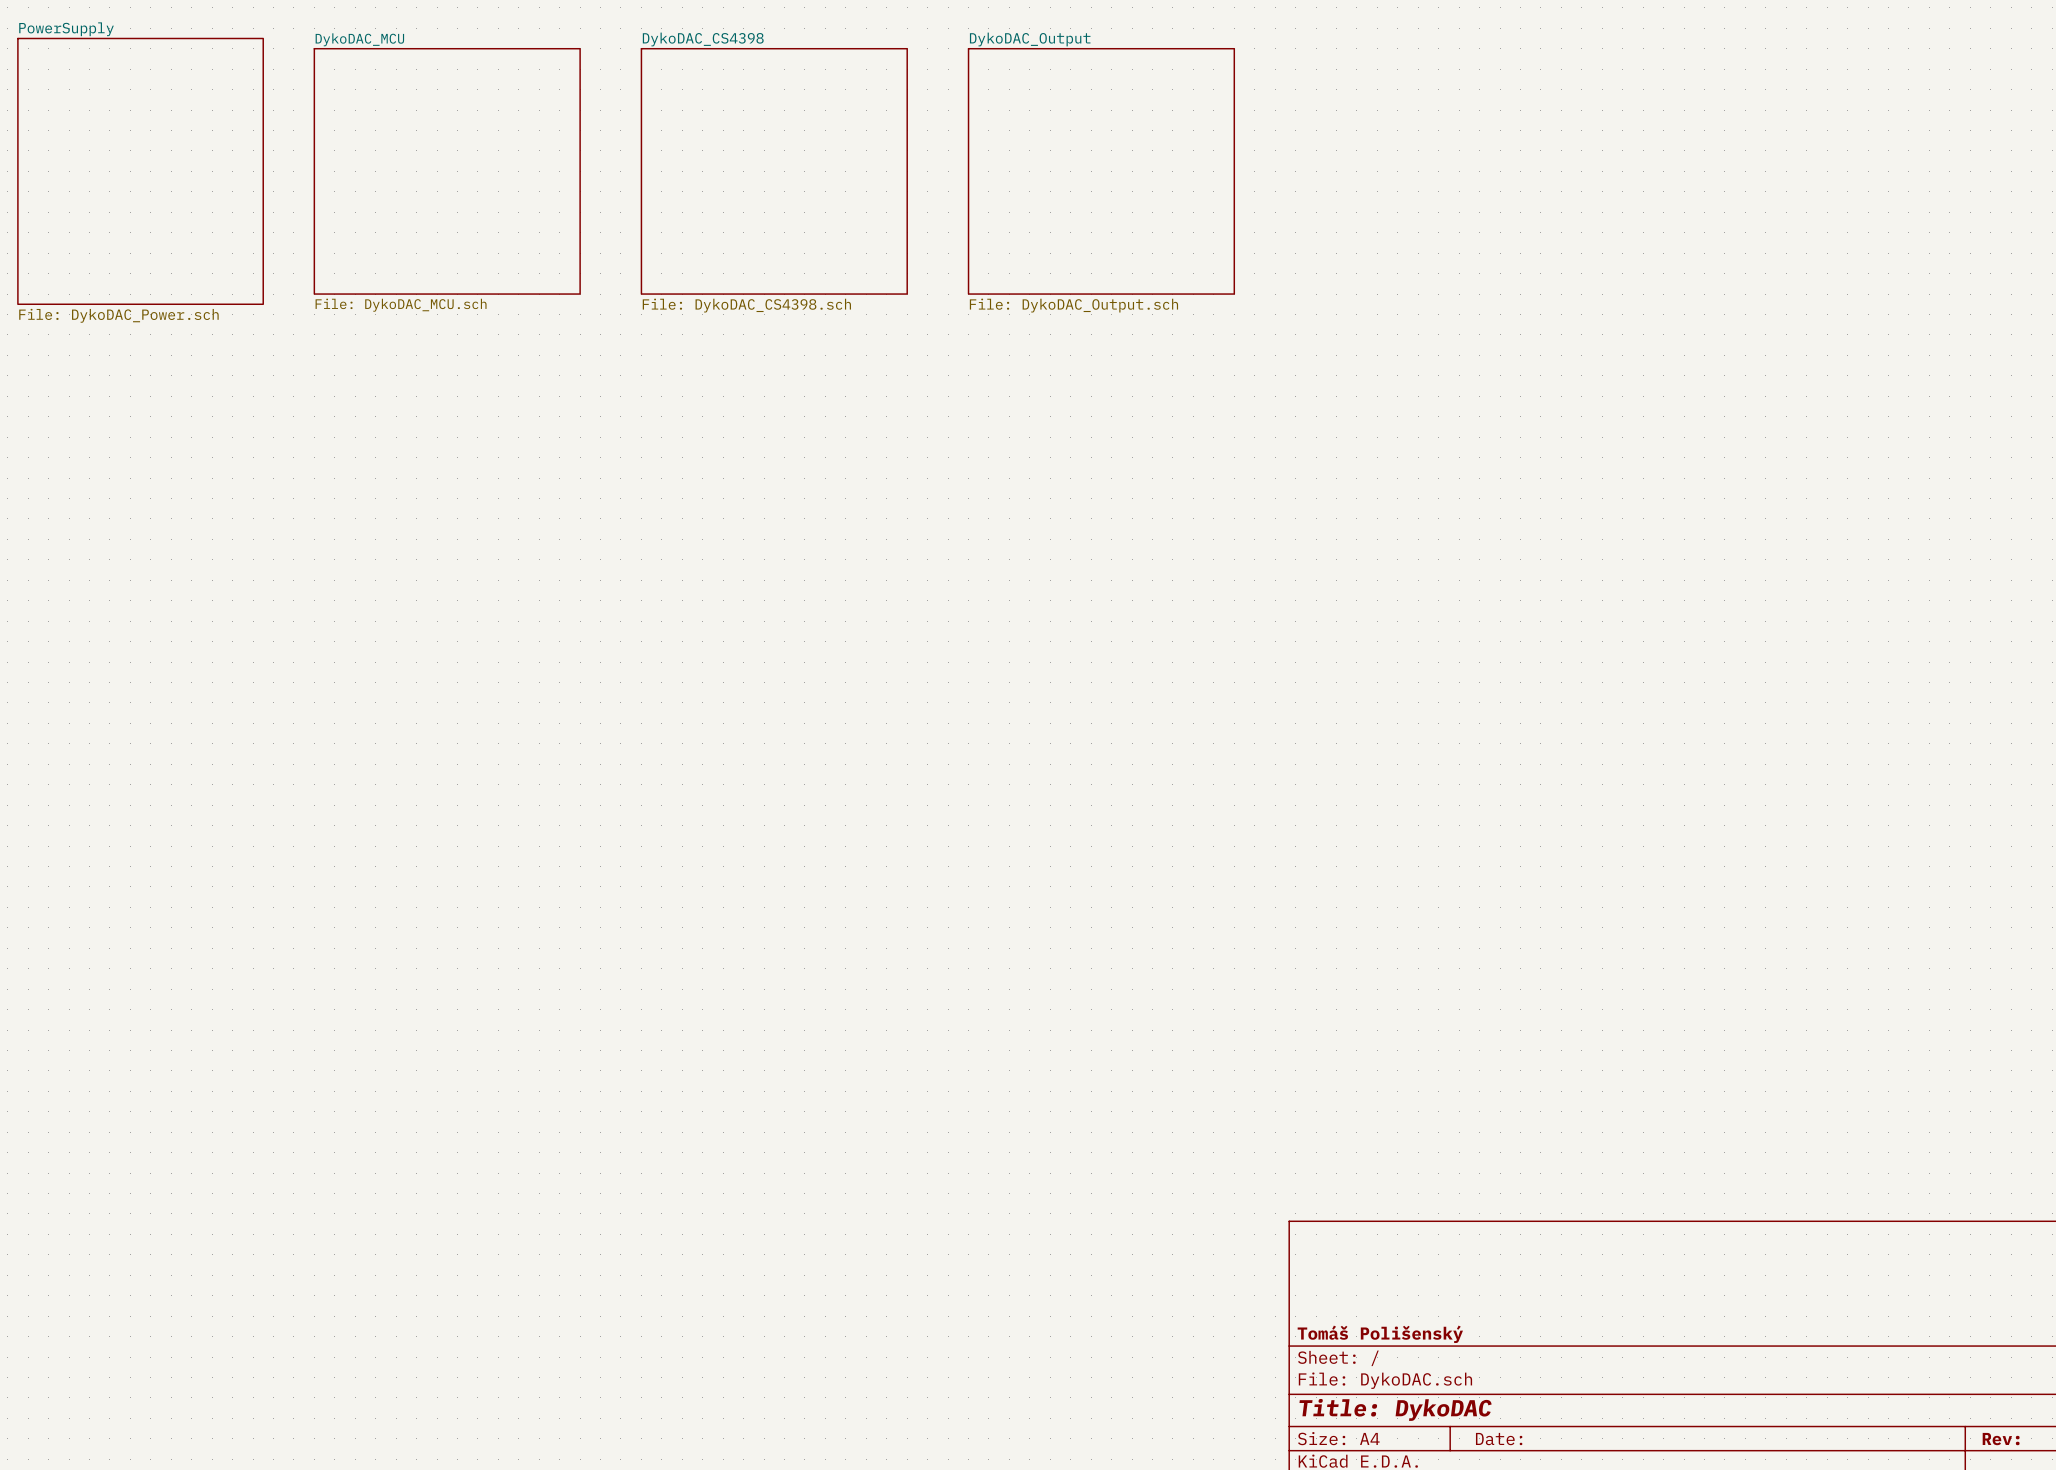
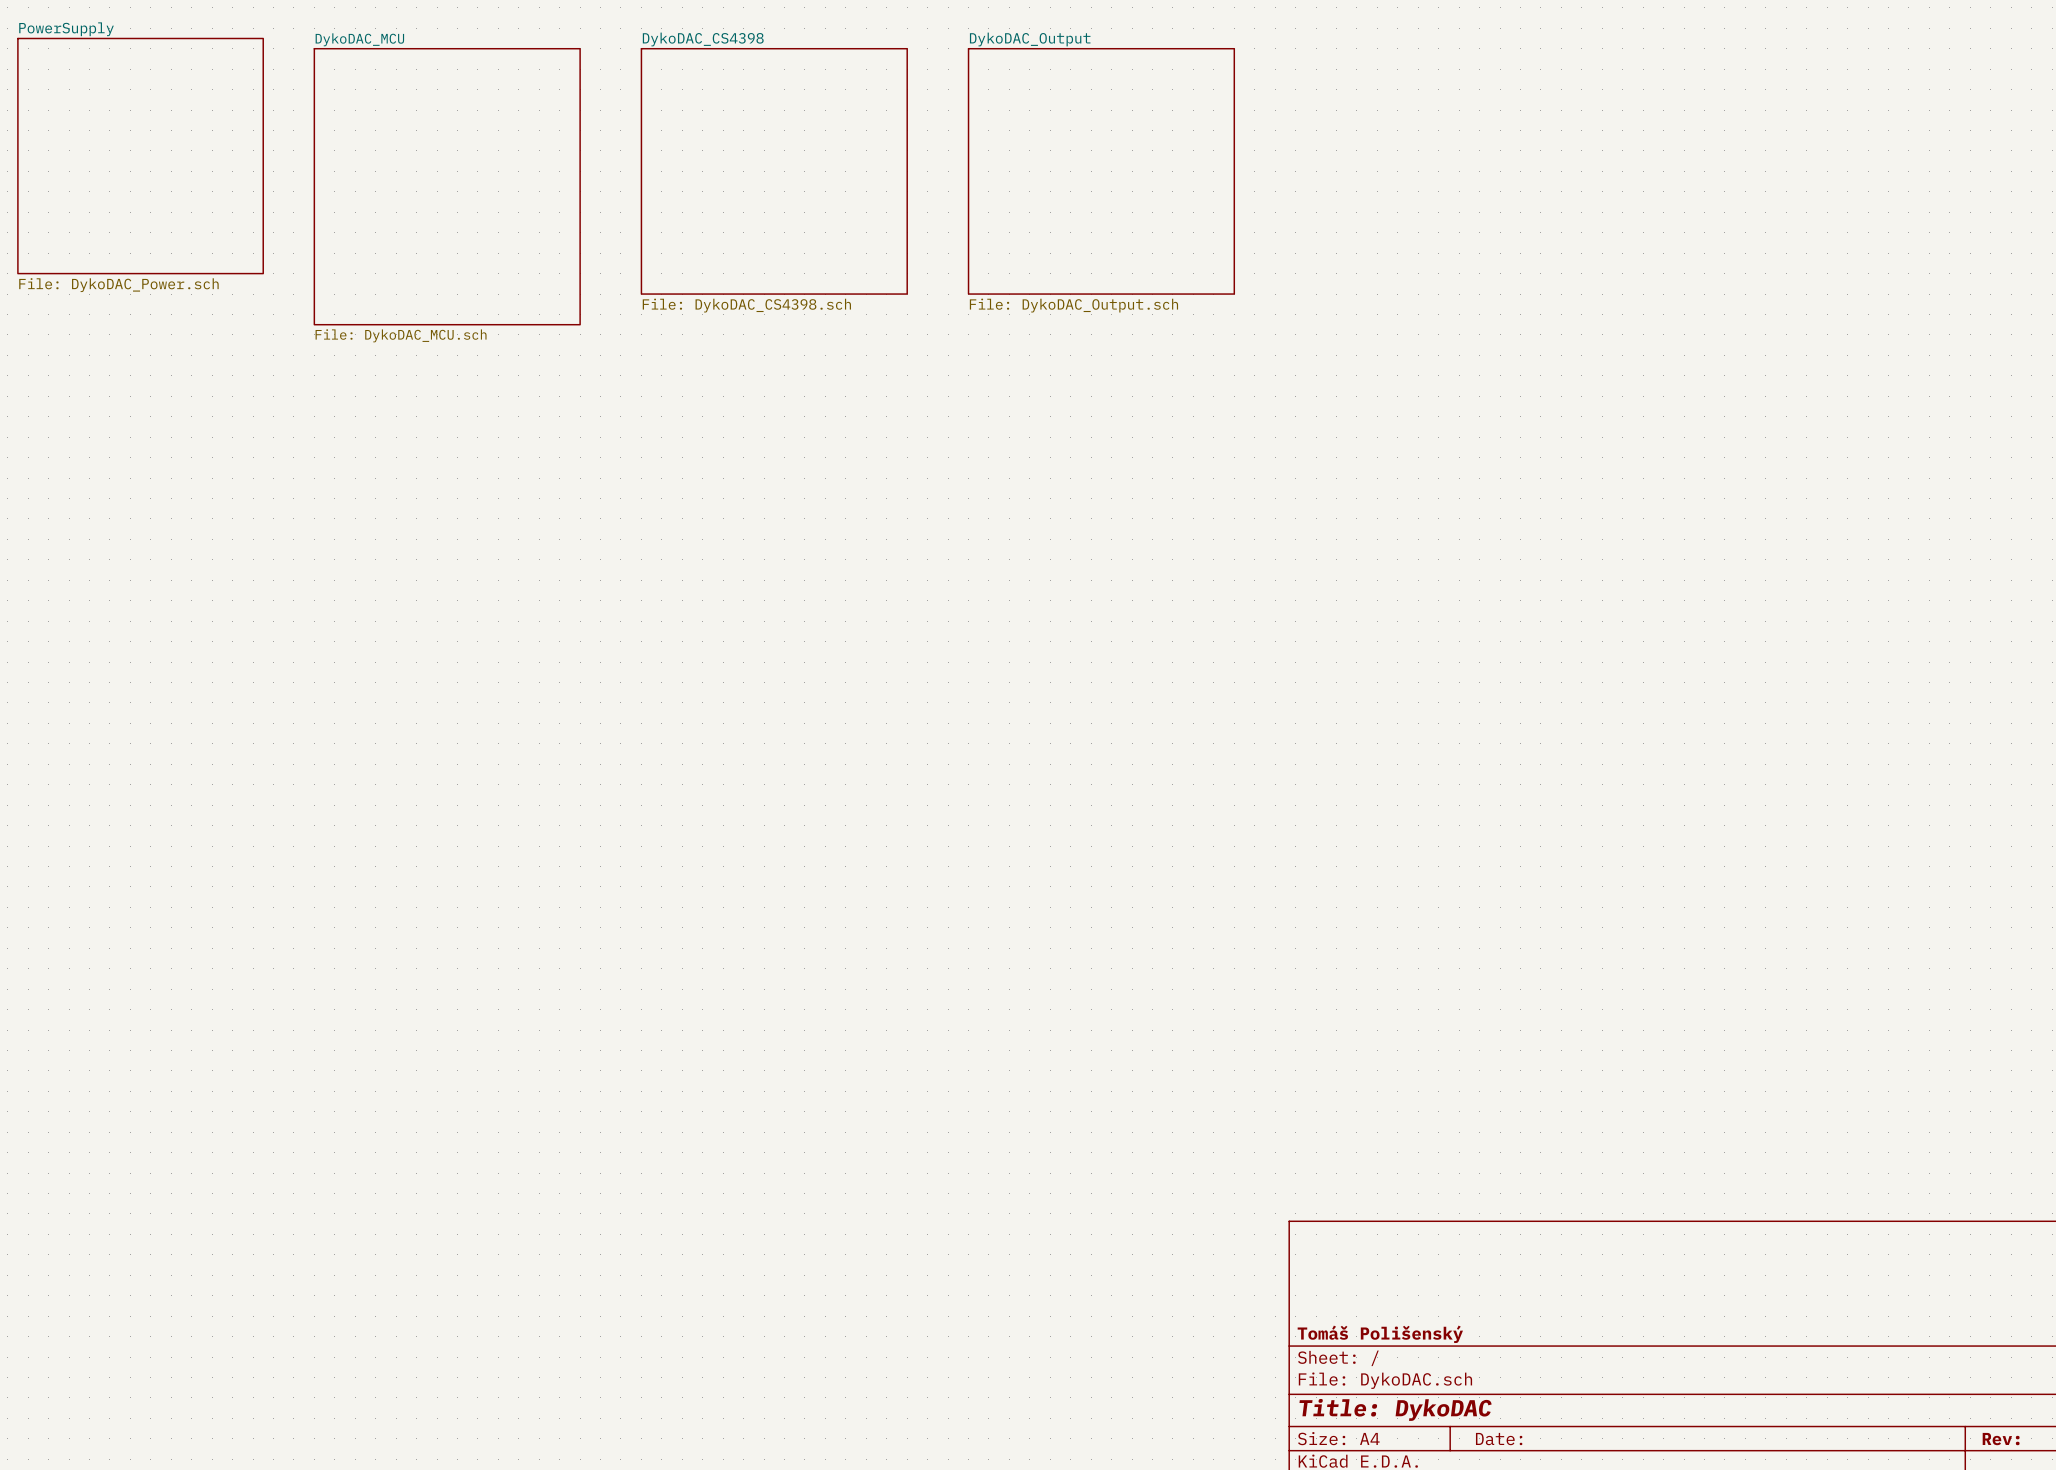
sheet PowerSupply: none -> File: DykoDAC_Power.sch (140, 156)
sheet PowerSupply: File: DykoDAC_Power.sch (140, 171) -> none
sheet DykoDAC_MCU: File: DykoDAC_MCU.sch (447, 171) -> none
sheet DykoDAC_MCU: none -> File: DykoDAC_MCU.sch (447, 186)

